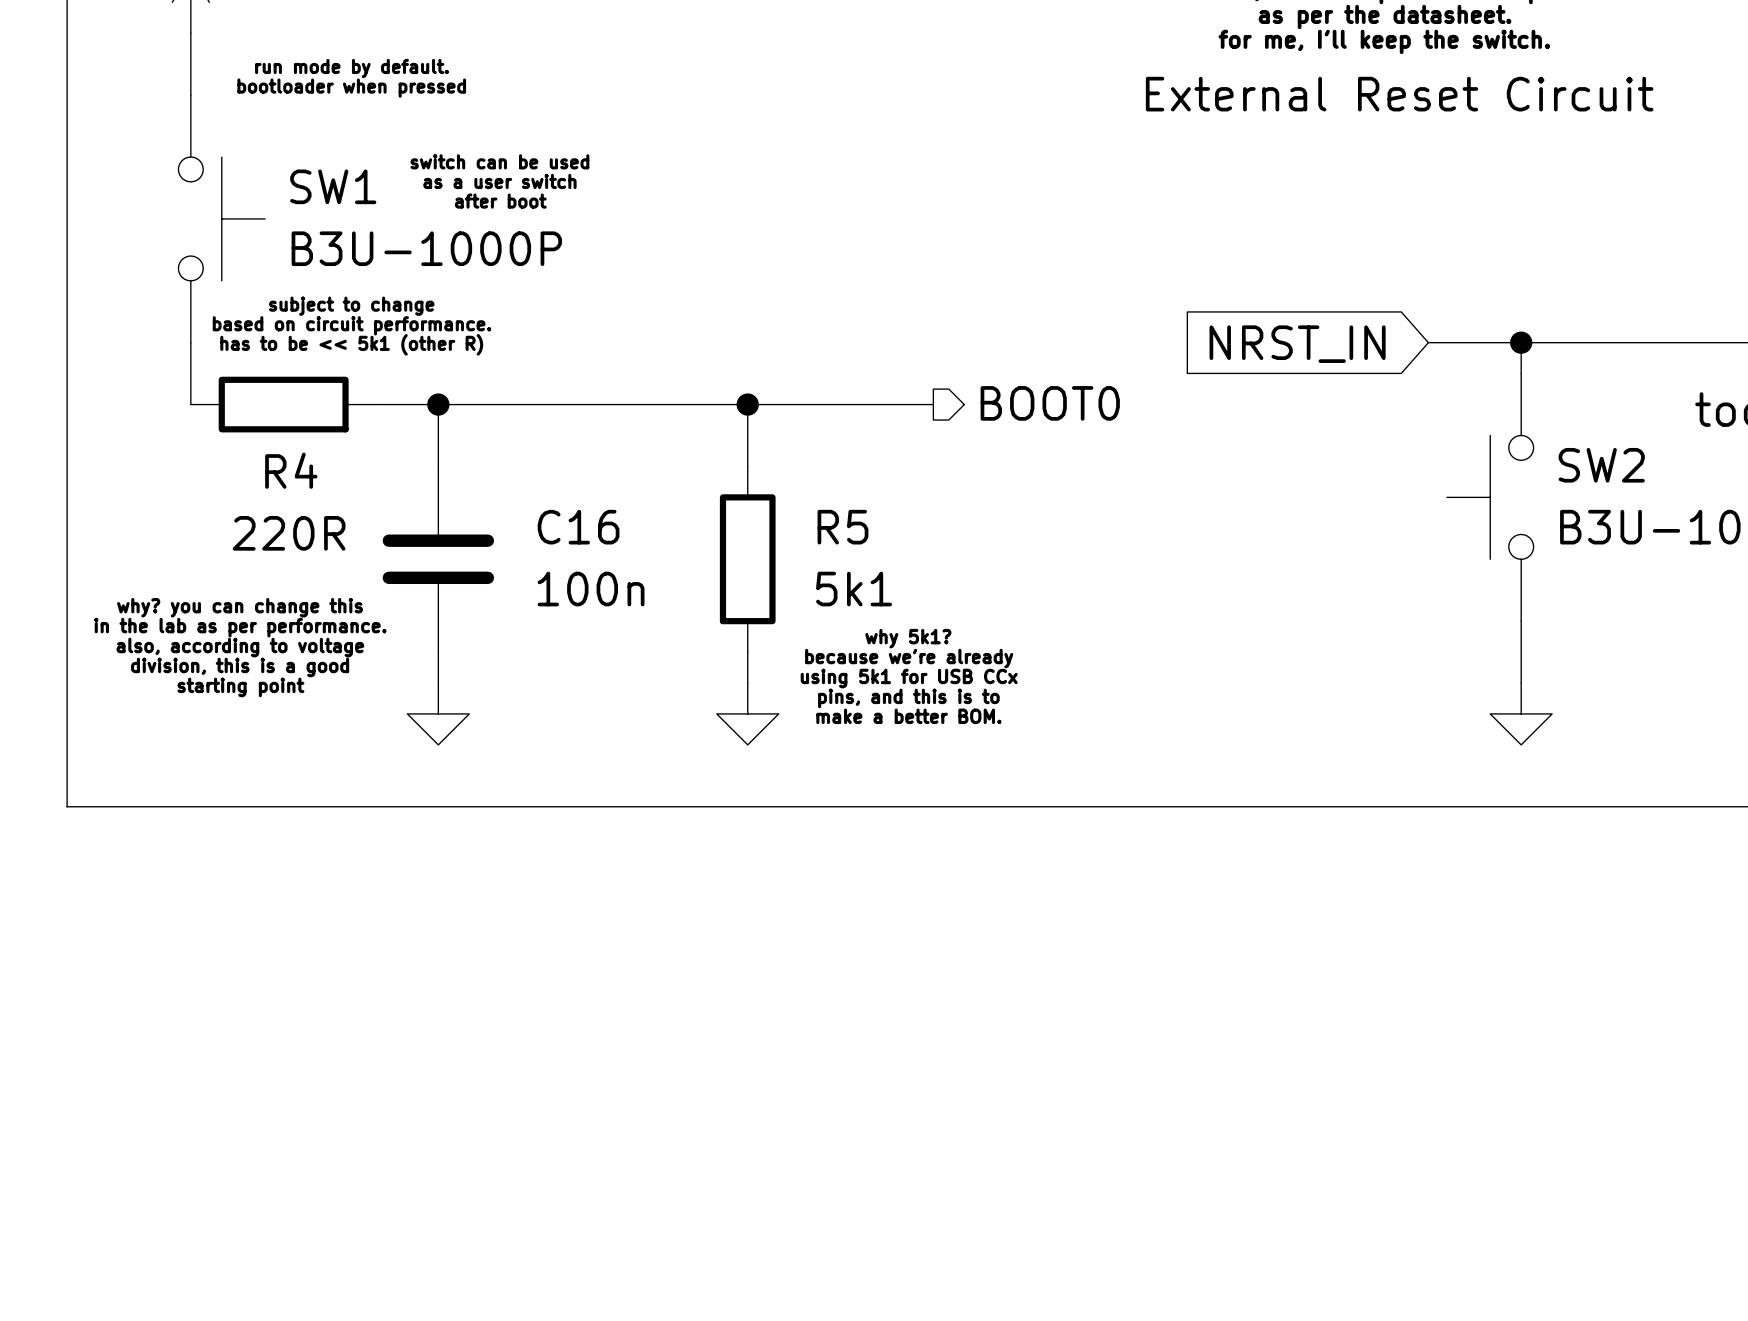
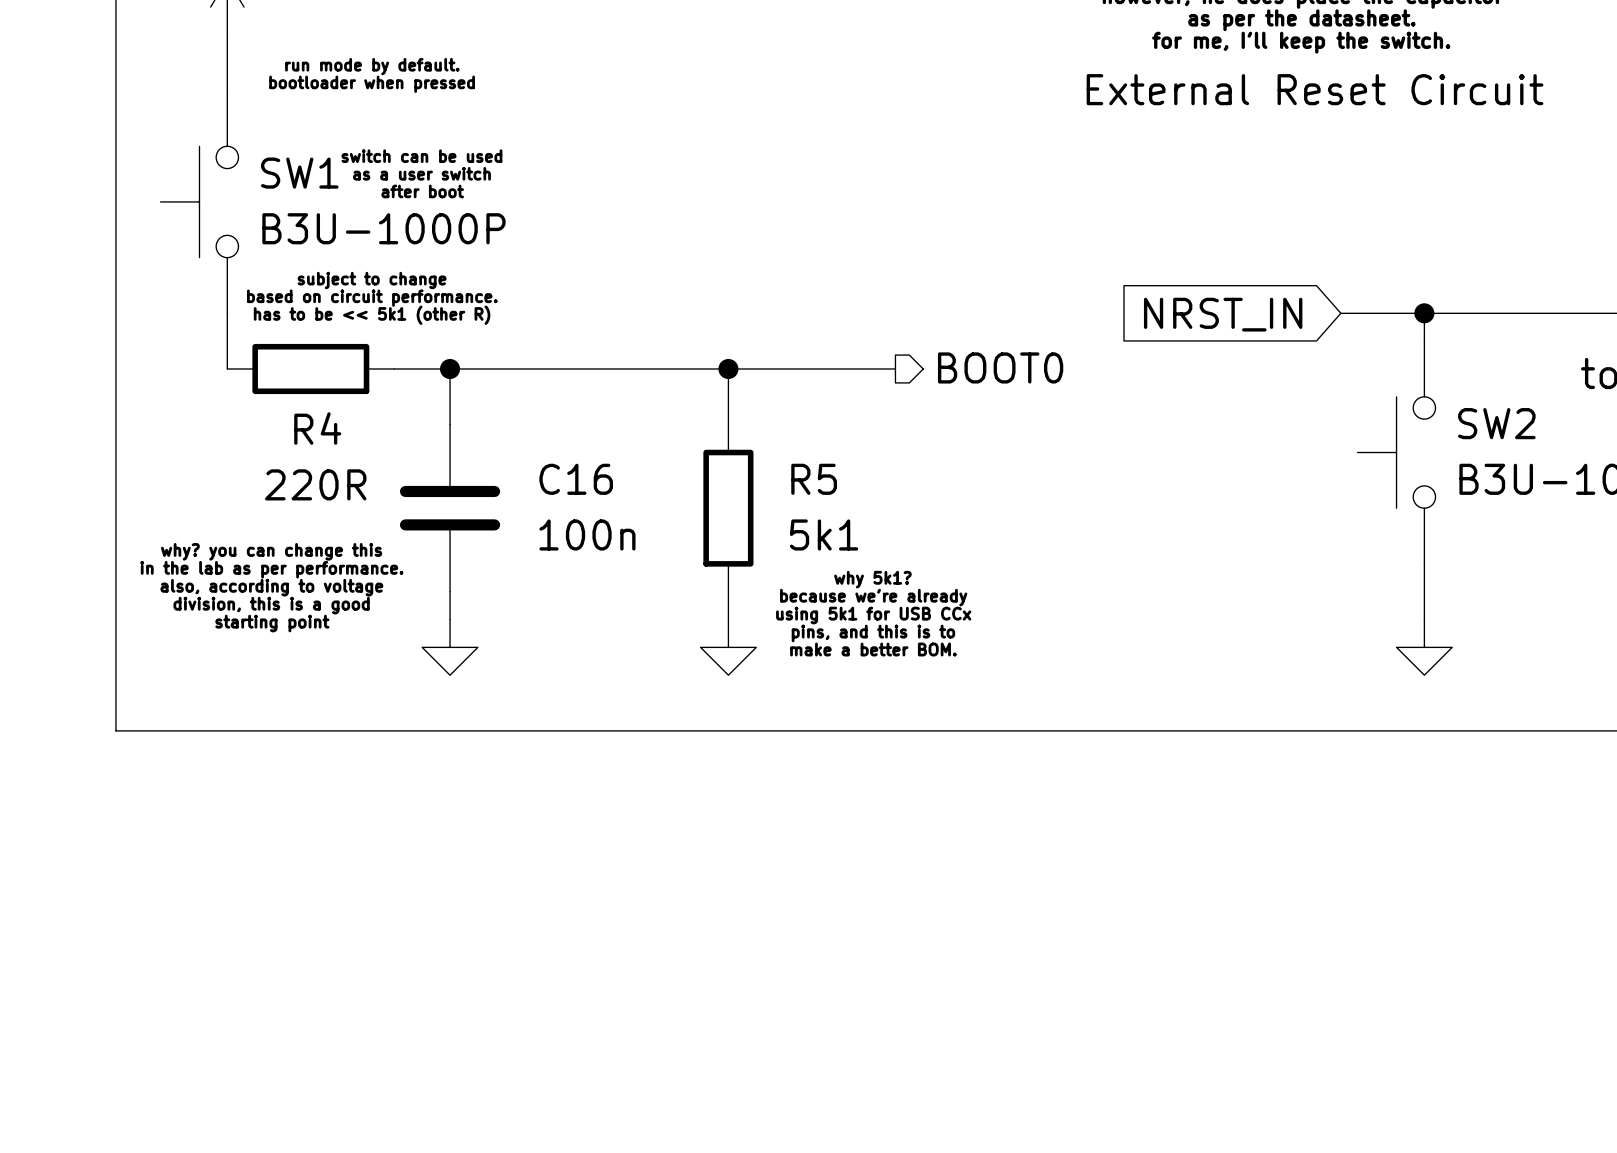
text position: switch can be used (499, 161) -> switch can be used (421, 156)
text position: as a user switch (499, 181) -> as a user switch (421, 173)
text position: after boot (500, 201) -> after boot (422, 191)
SW1 rotation: 0° (221, 218) -> 180° (199, 201)

